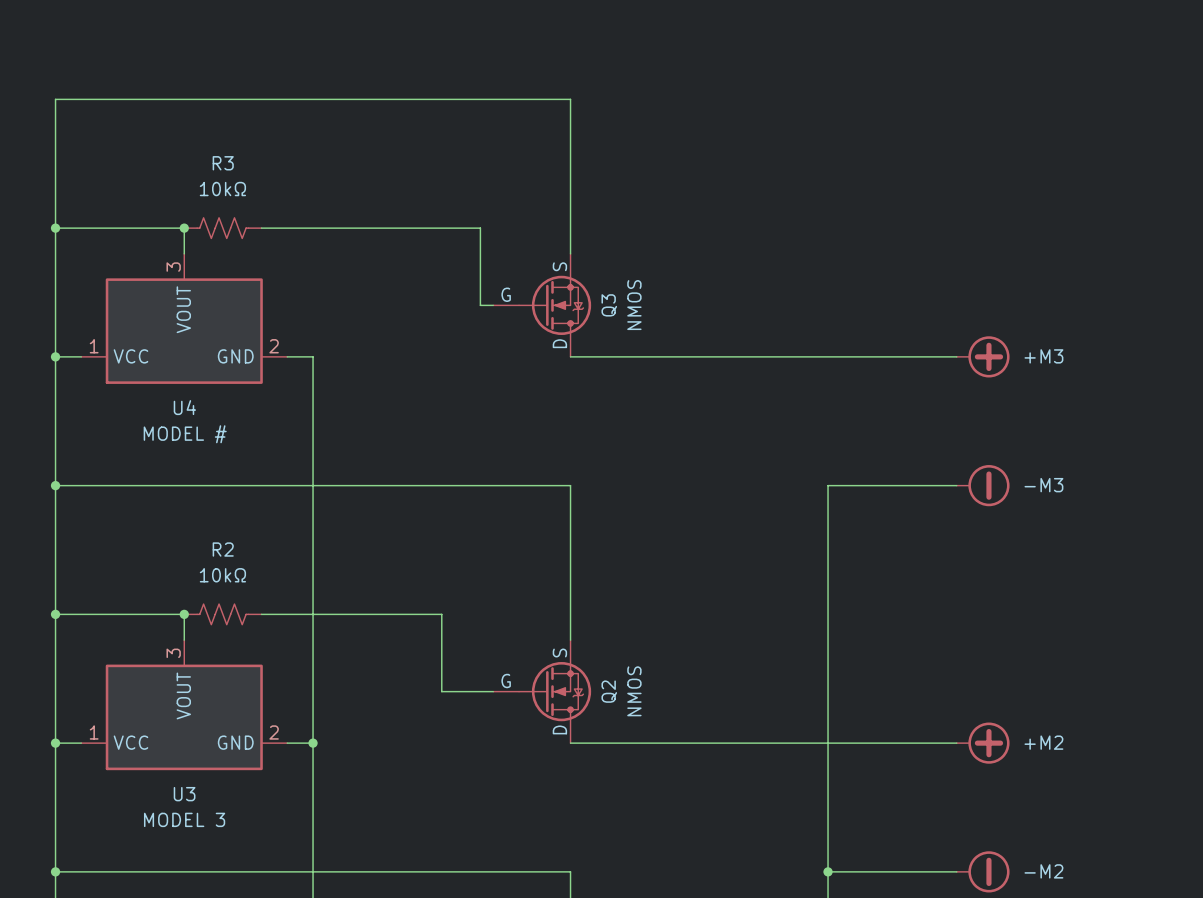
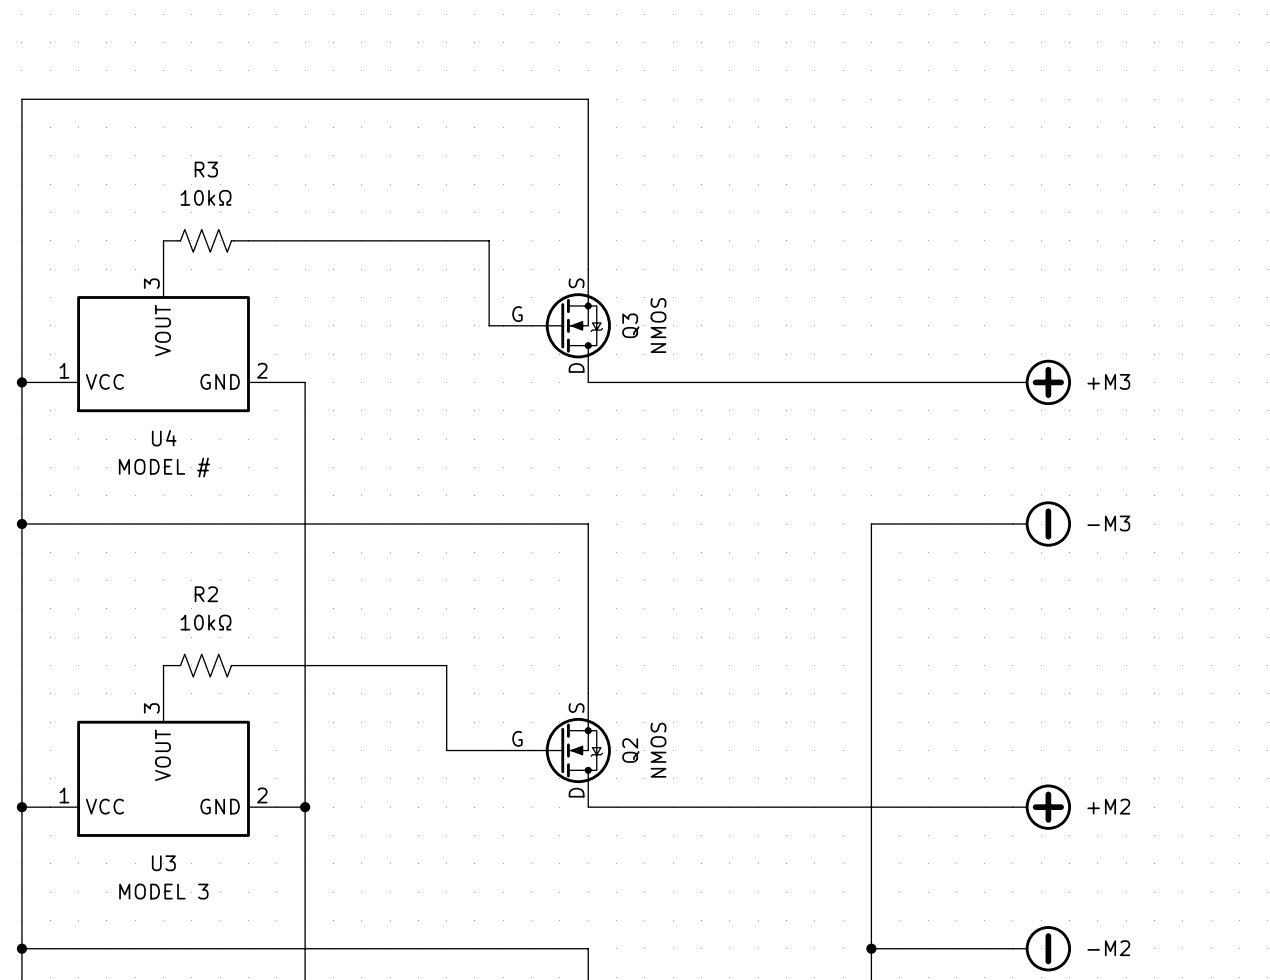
wire: (55, 228) (184, 228) -> none
junction: (55, 228) -> none
junction: (184, 228) -> none
wire: (55, 614) (184, 614) -> none
junction: (55, 614) -> none
junction: (184, 614) -> none

